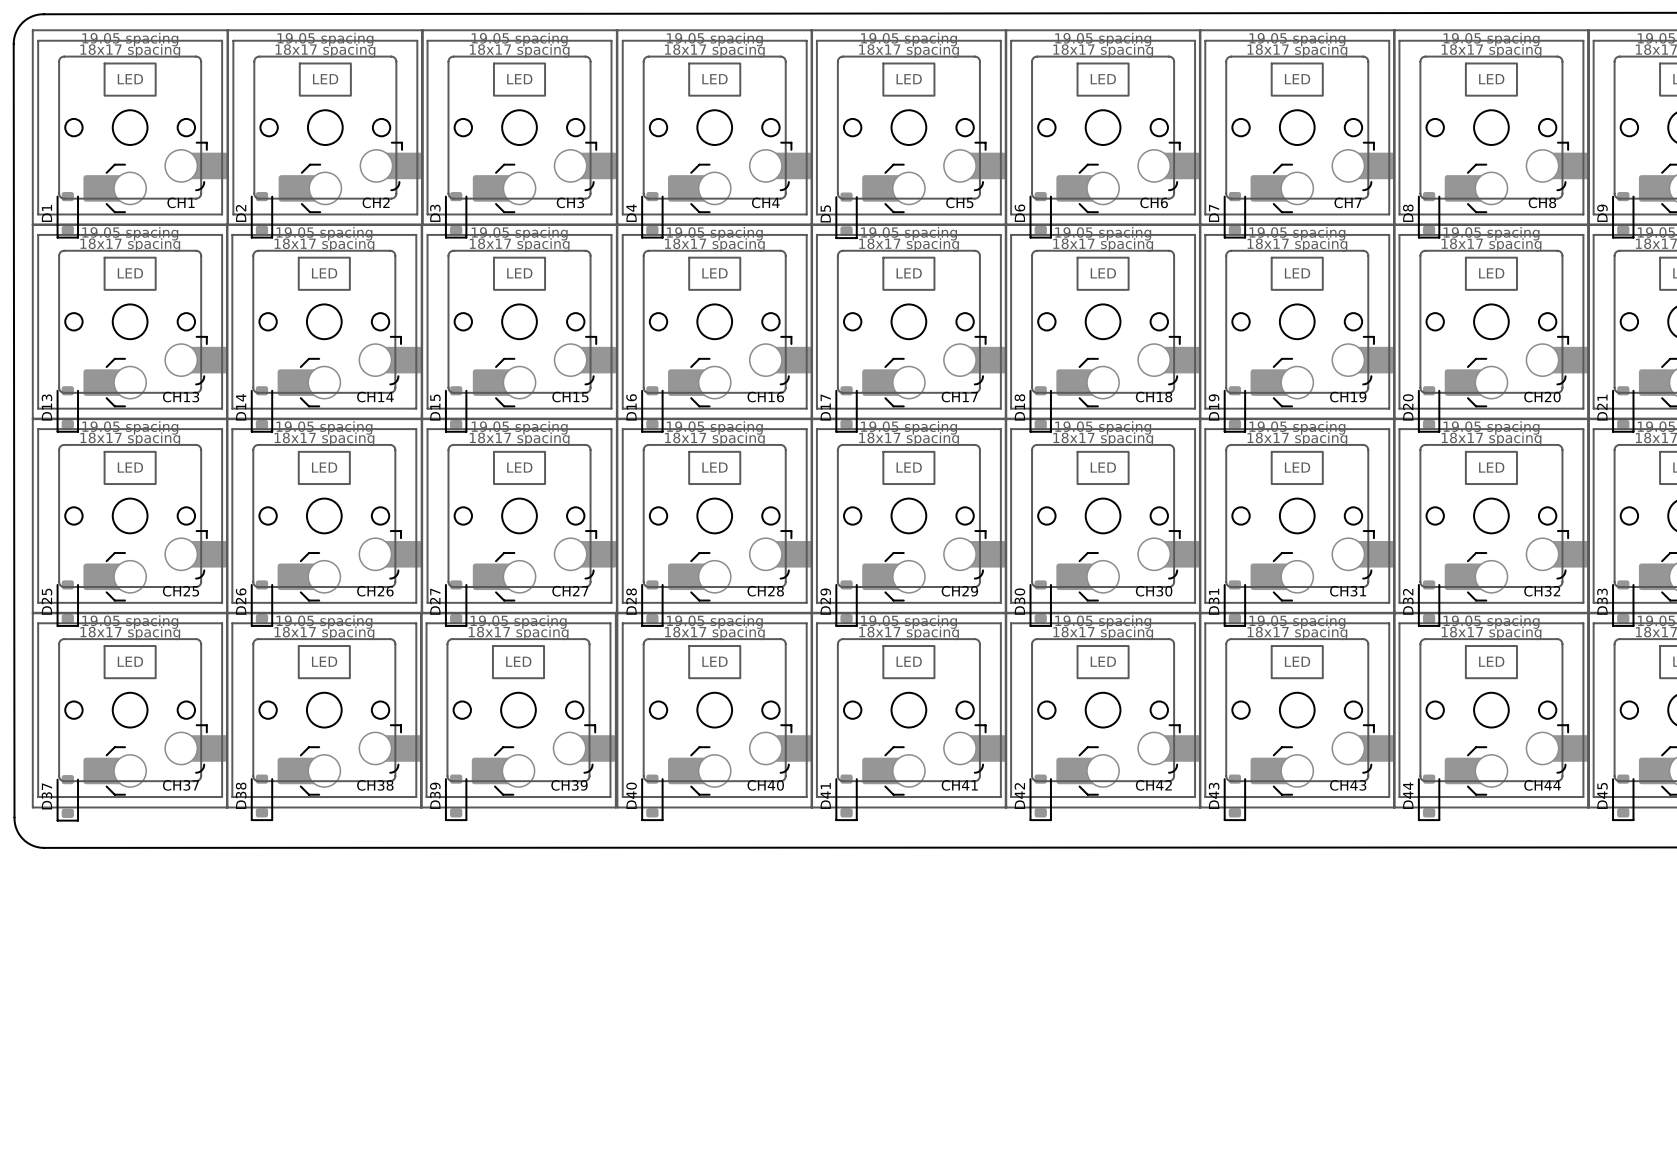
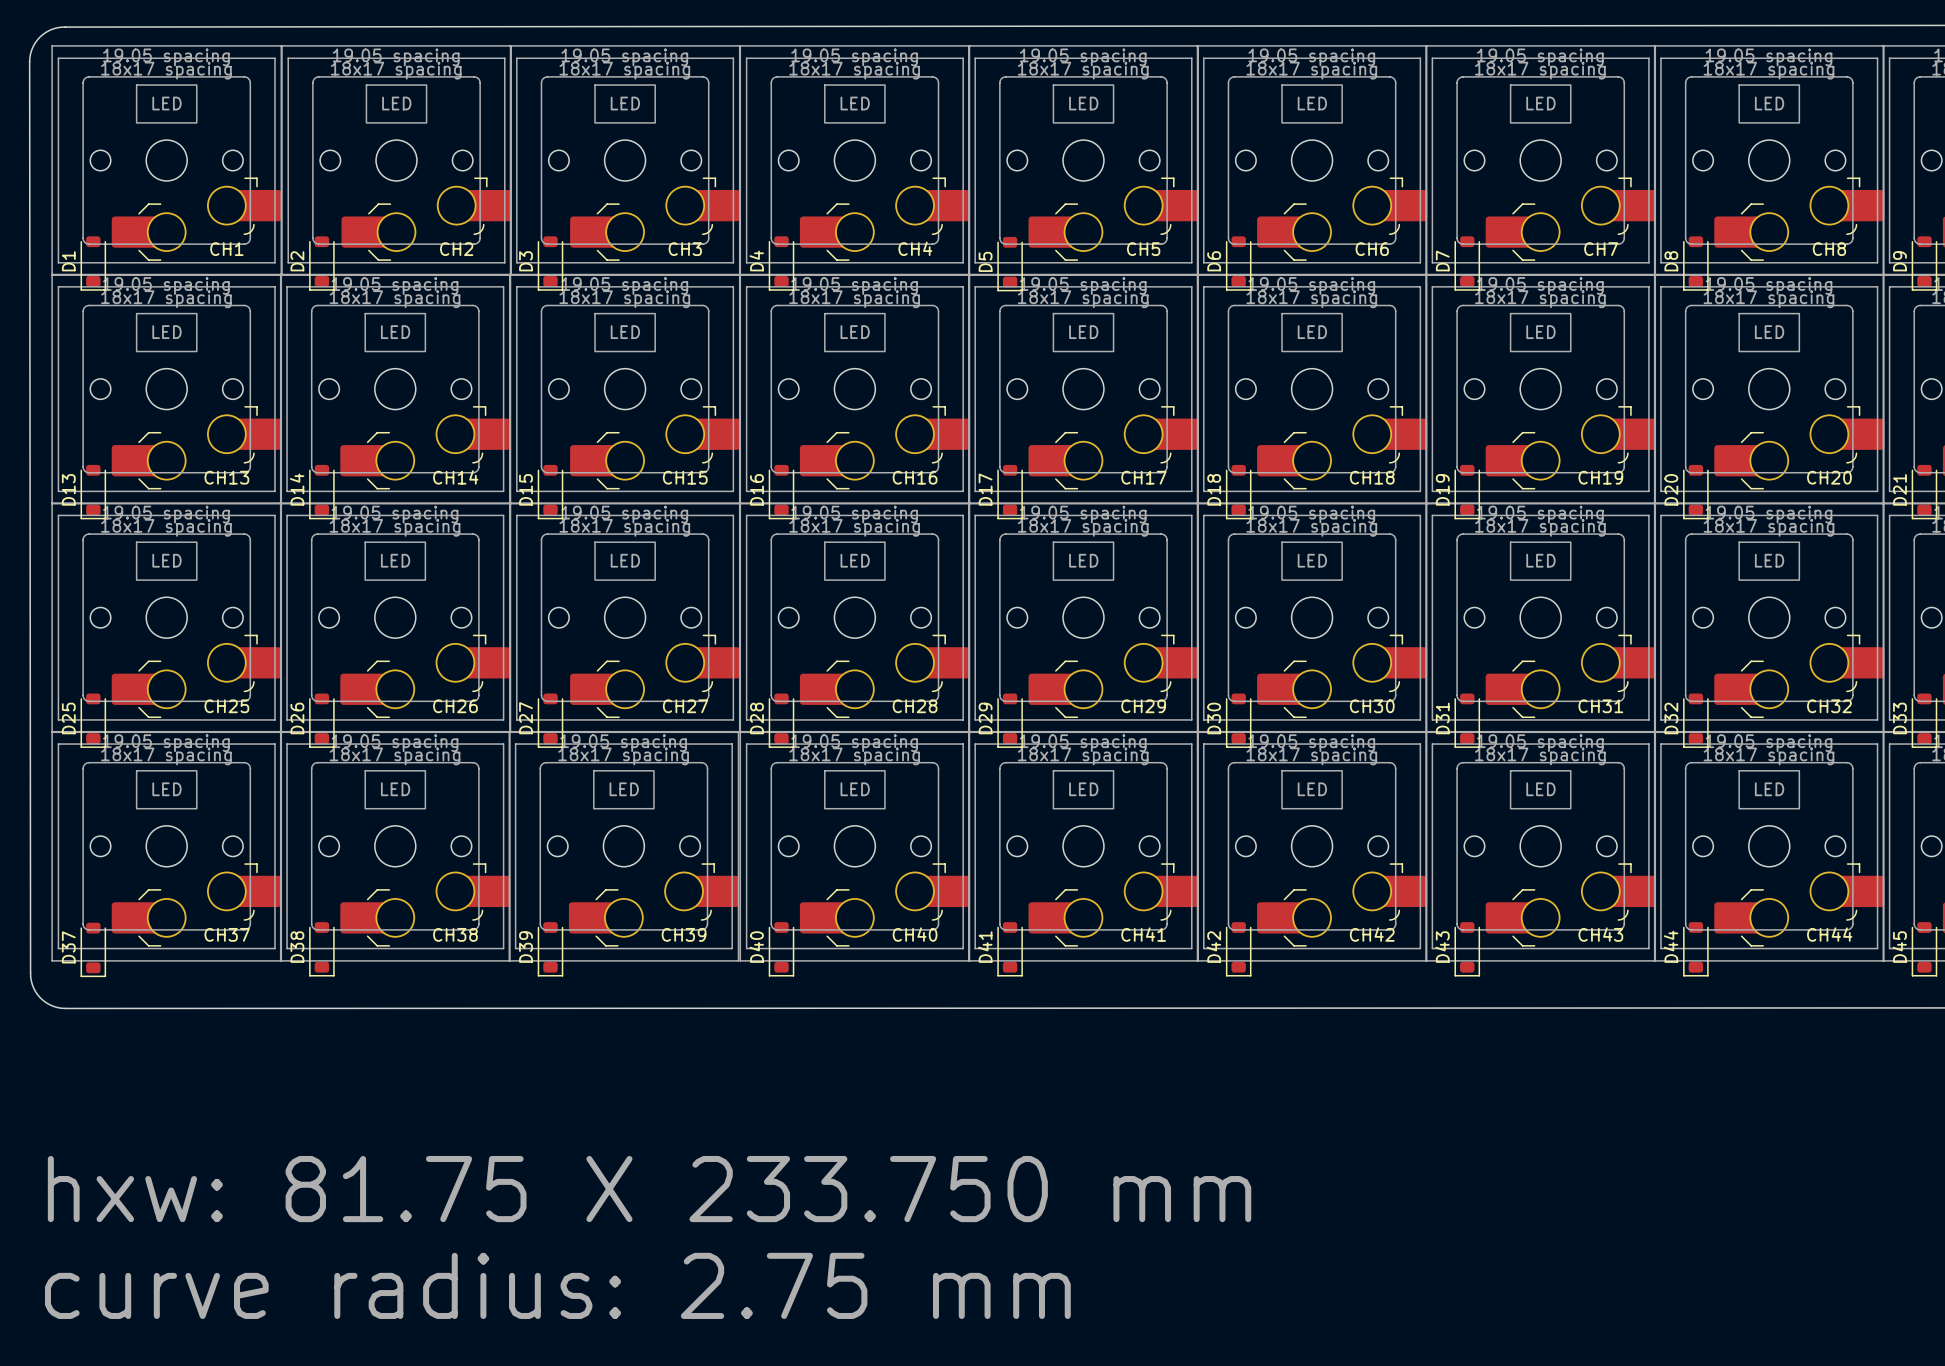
text: none -> hxw: 81.75 X 233.750 mm (649, 1189)
text: none -> curve radius: 2.75 mm (557, 1285)

